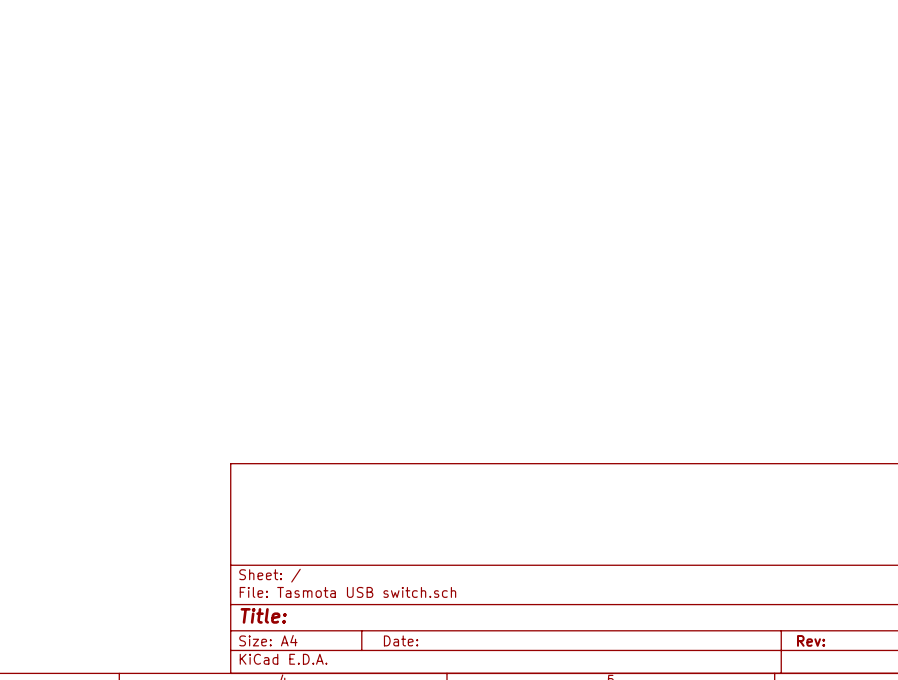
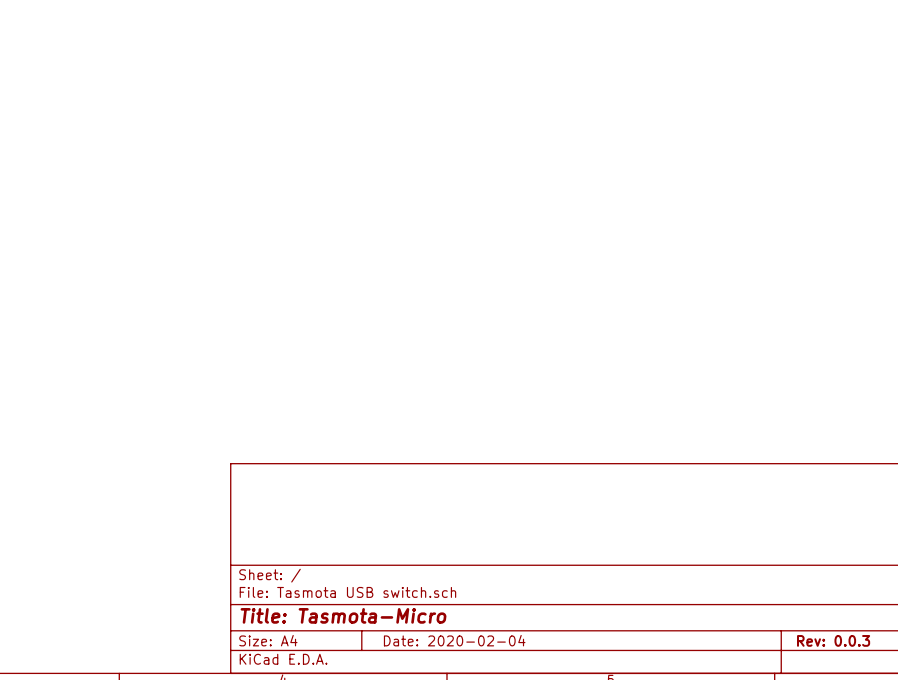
title block: Title: (263, 615) -> Title: Tasmota-Micro (343, 615)
title block: Date: (401, 640) -> Date: 2020-02-04 (454, 640)
title block: Rev: (811, 640) -> Rev: 0.0.3 (833, 640)

